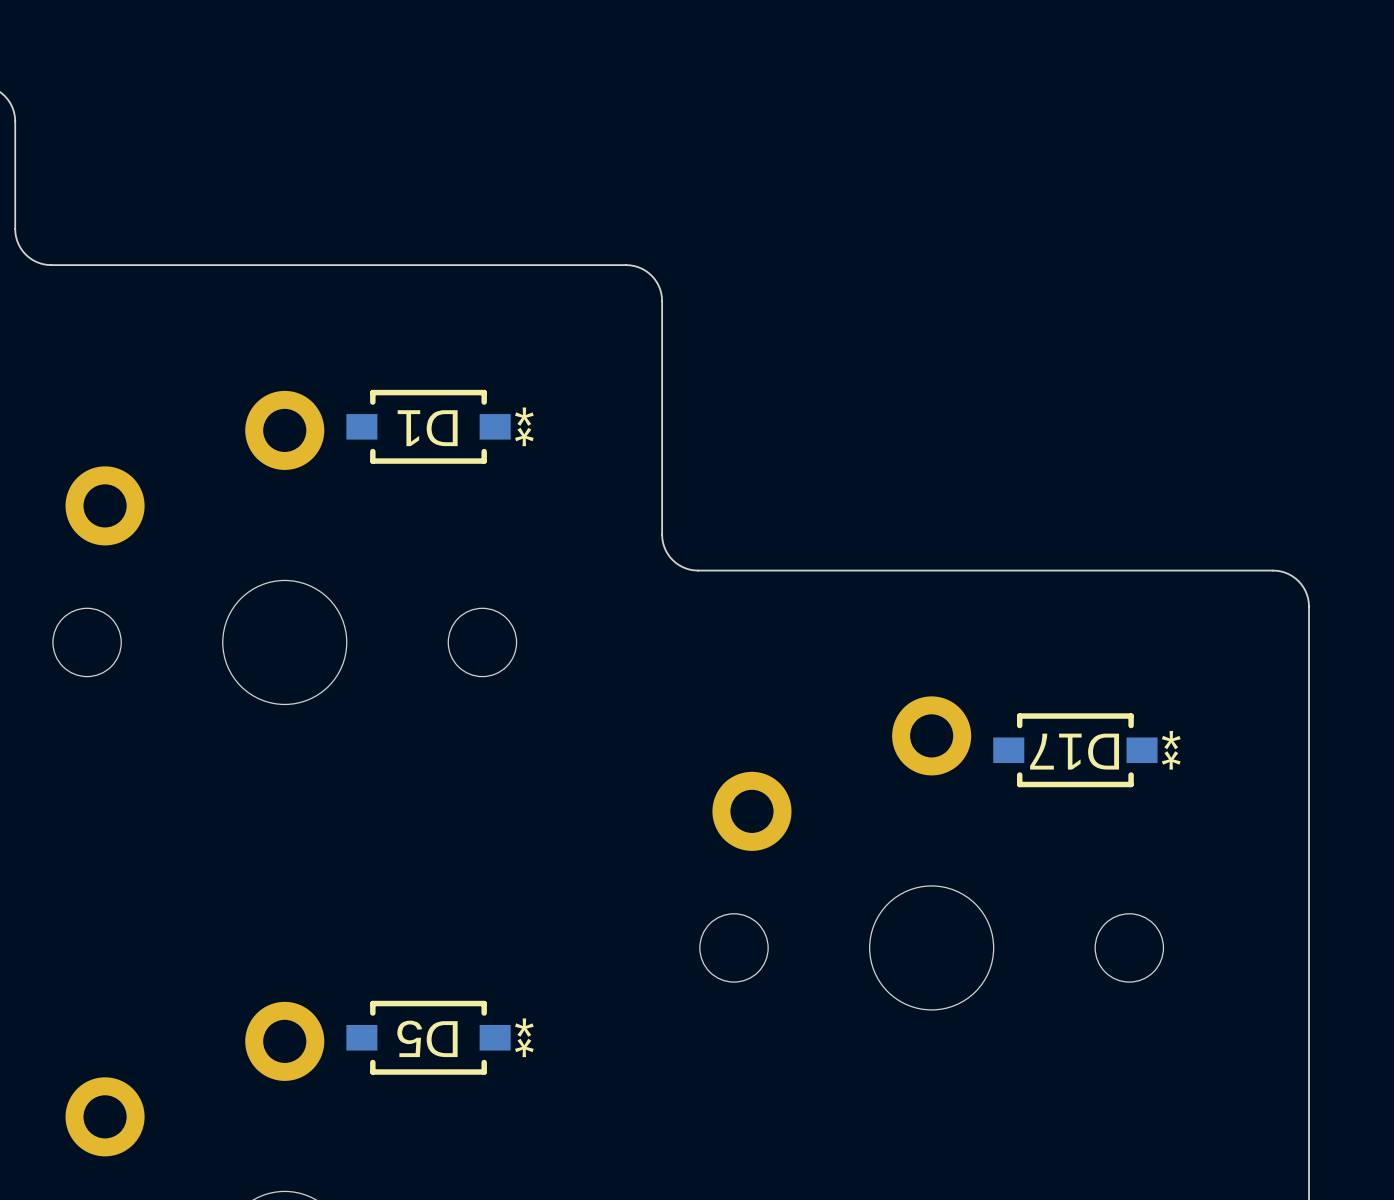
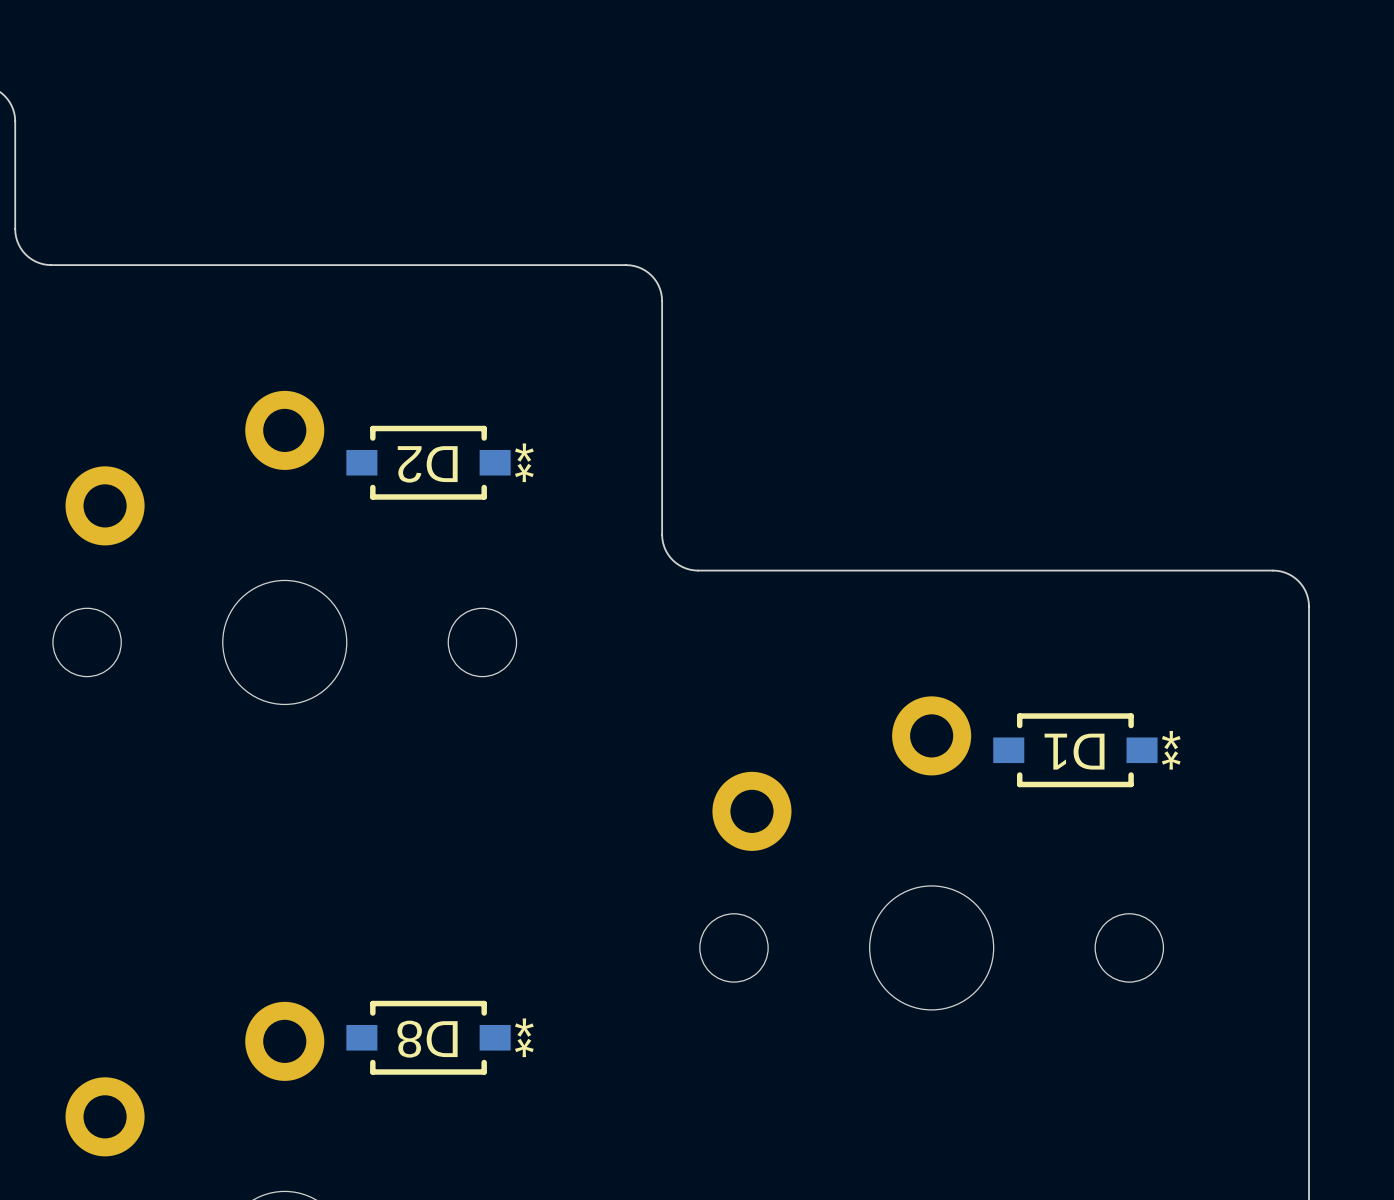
D1 position: (428, 426) -> (428, 462)
D1 name: D1 (427, 428) -> D2 (427, 464)
D17 name: D17 (1074, 751) -> D1 (1074, 751)
D5 name: D5 (427, 1038) -> D8 (427, 1039)

